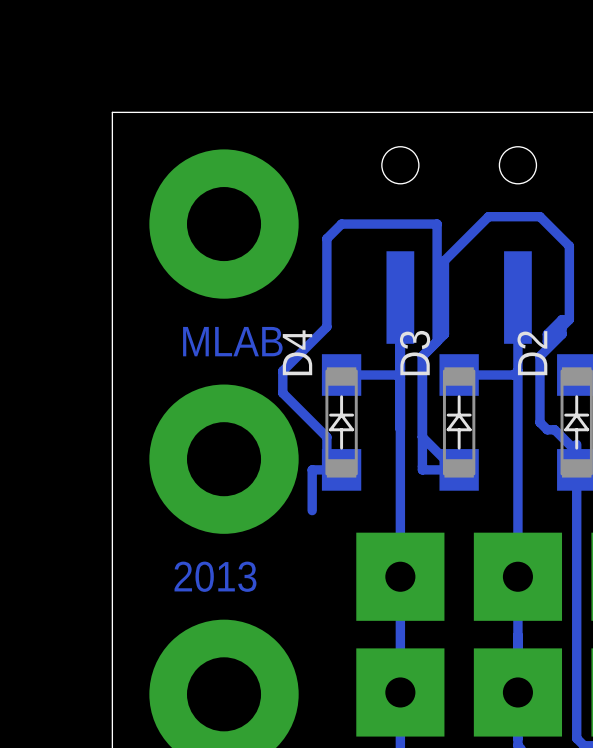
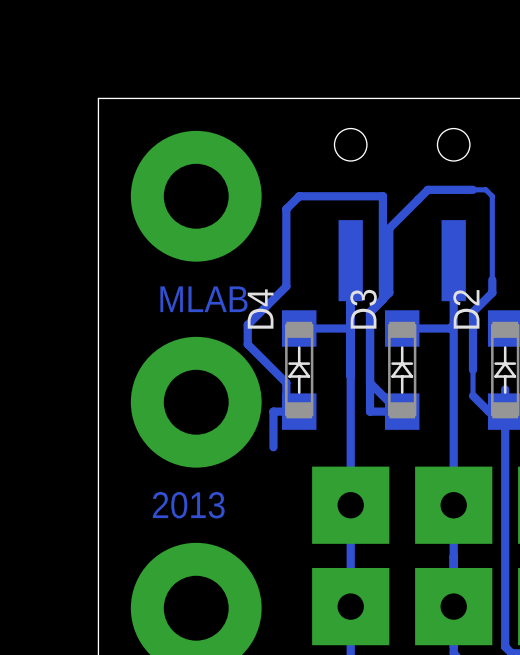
bottom track: (539, 216) (569, 246) (569, 319) (547, 341) (547, 334) (562, 319) -> (418, 199) (427, 189) (485, 189) (492, 196) (492, 279)
bottom track: (539, 422) (547, 429) (554, 429) (576, 451) -> (473, 370) (473, 395) (488, 411) (505, 411)

